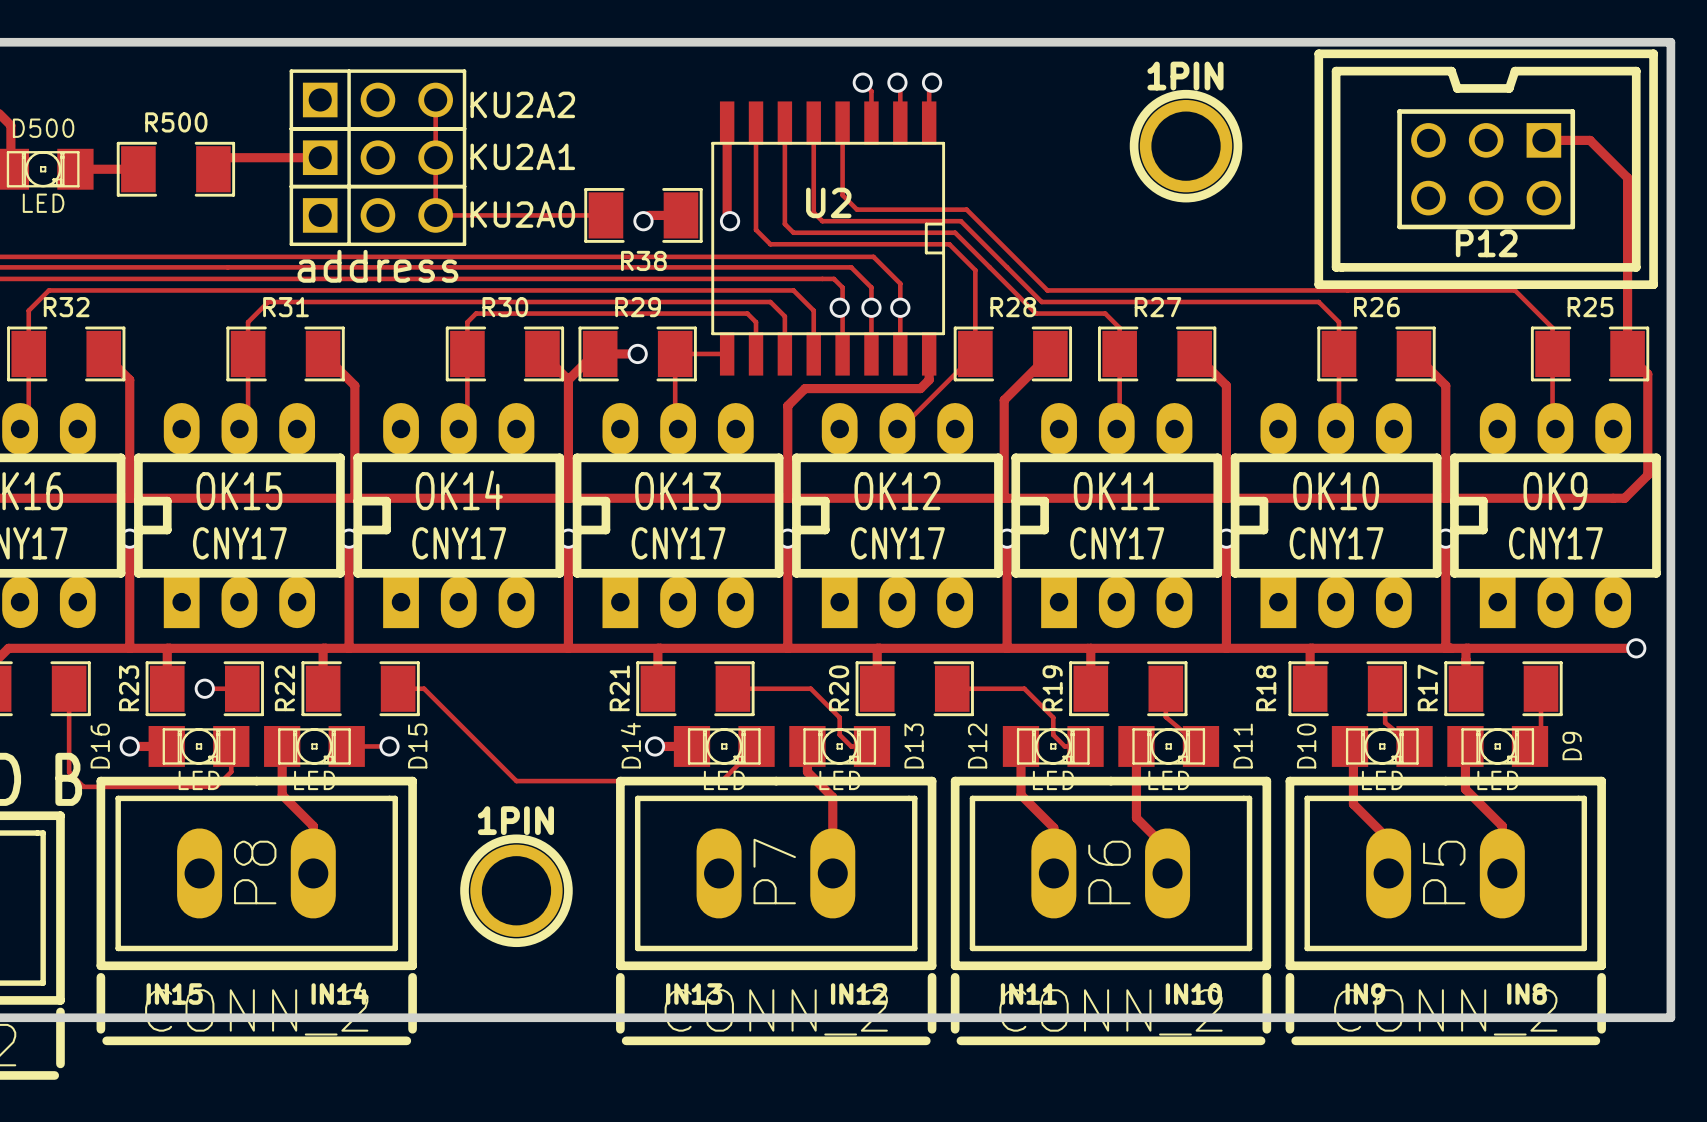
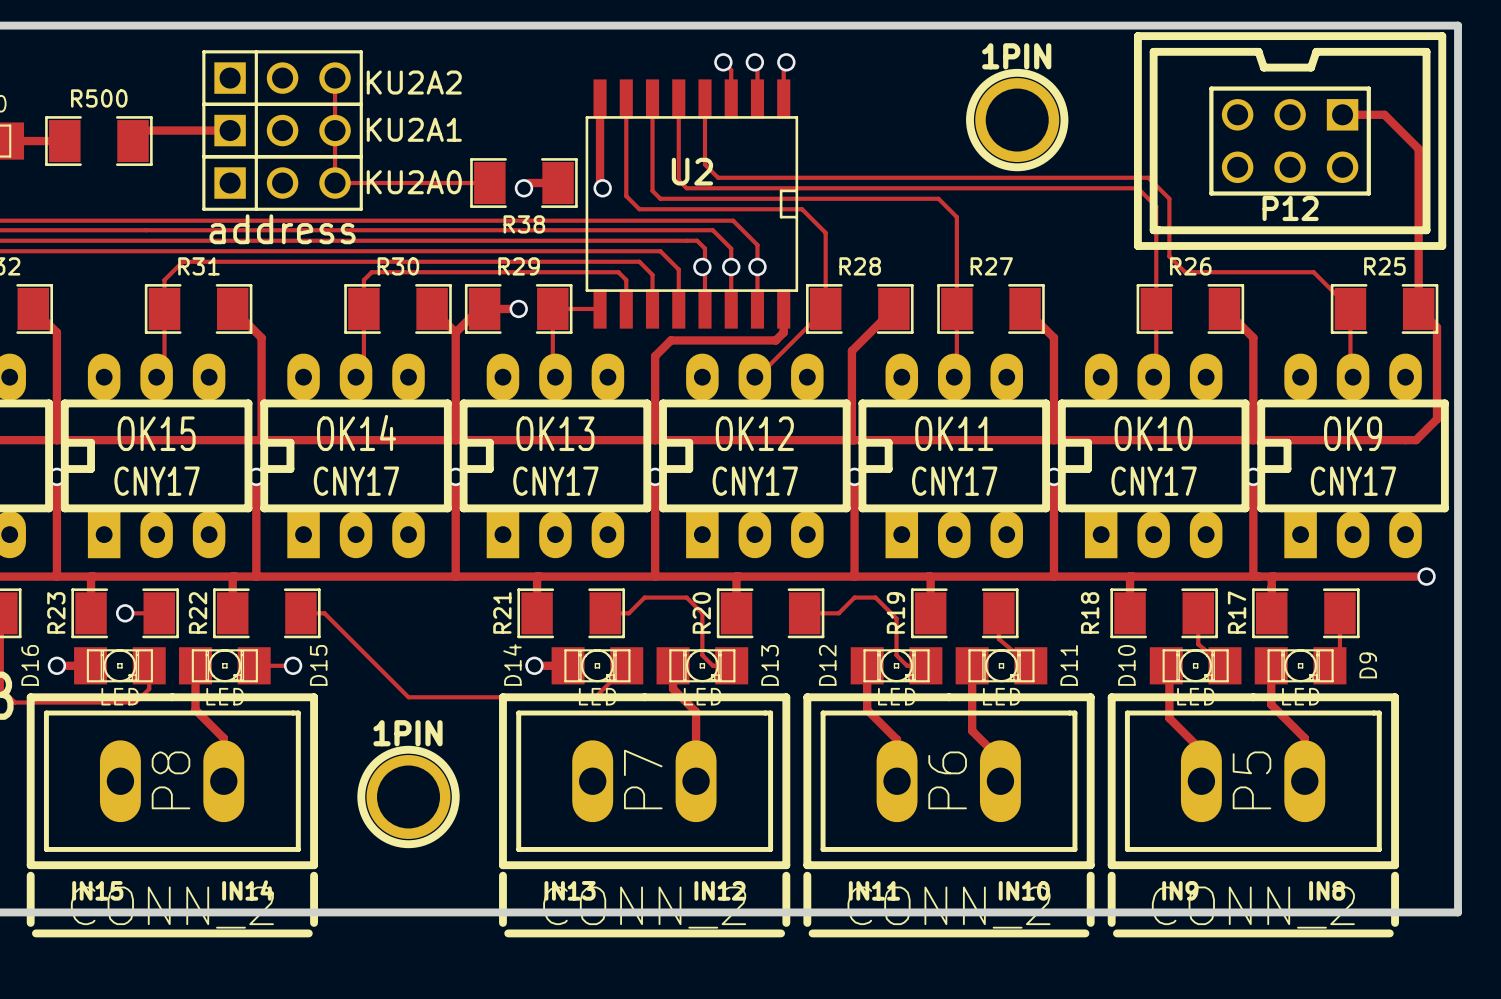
track: (966, 209) (1047, 290) (1515, 290) (1552, 327) (1552, 353) -> (817, 177) (1148, 177) (1169, 198) (1169, 256) (1185, 272) (1313, 272) (1350, 308)
track: (960, 221) (1041, 302) (1318, 302) (1338, 322) -> (812, 188) (1137, 188) (1156, 206) (1156, 280)
track: (955, 232) (1035, 313) (1105, 313) (1119, 327) -> (807, 198) (938, 198) (956, 217) (956, 285)
track: (758, 688) (810, 688) (839, 717) -> (628, 613) (644, 597) (686, 597) (702, 613) (702, 639)
track: (989, 688) (1024, 688) (1053, 717) -> (838, 613) (854, 597) (875, 597) (896, 618) (896, 639)

